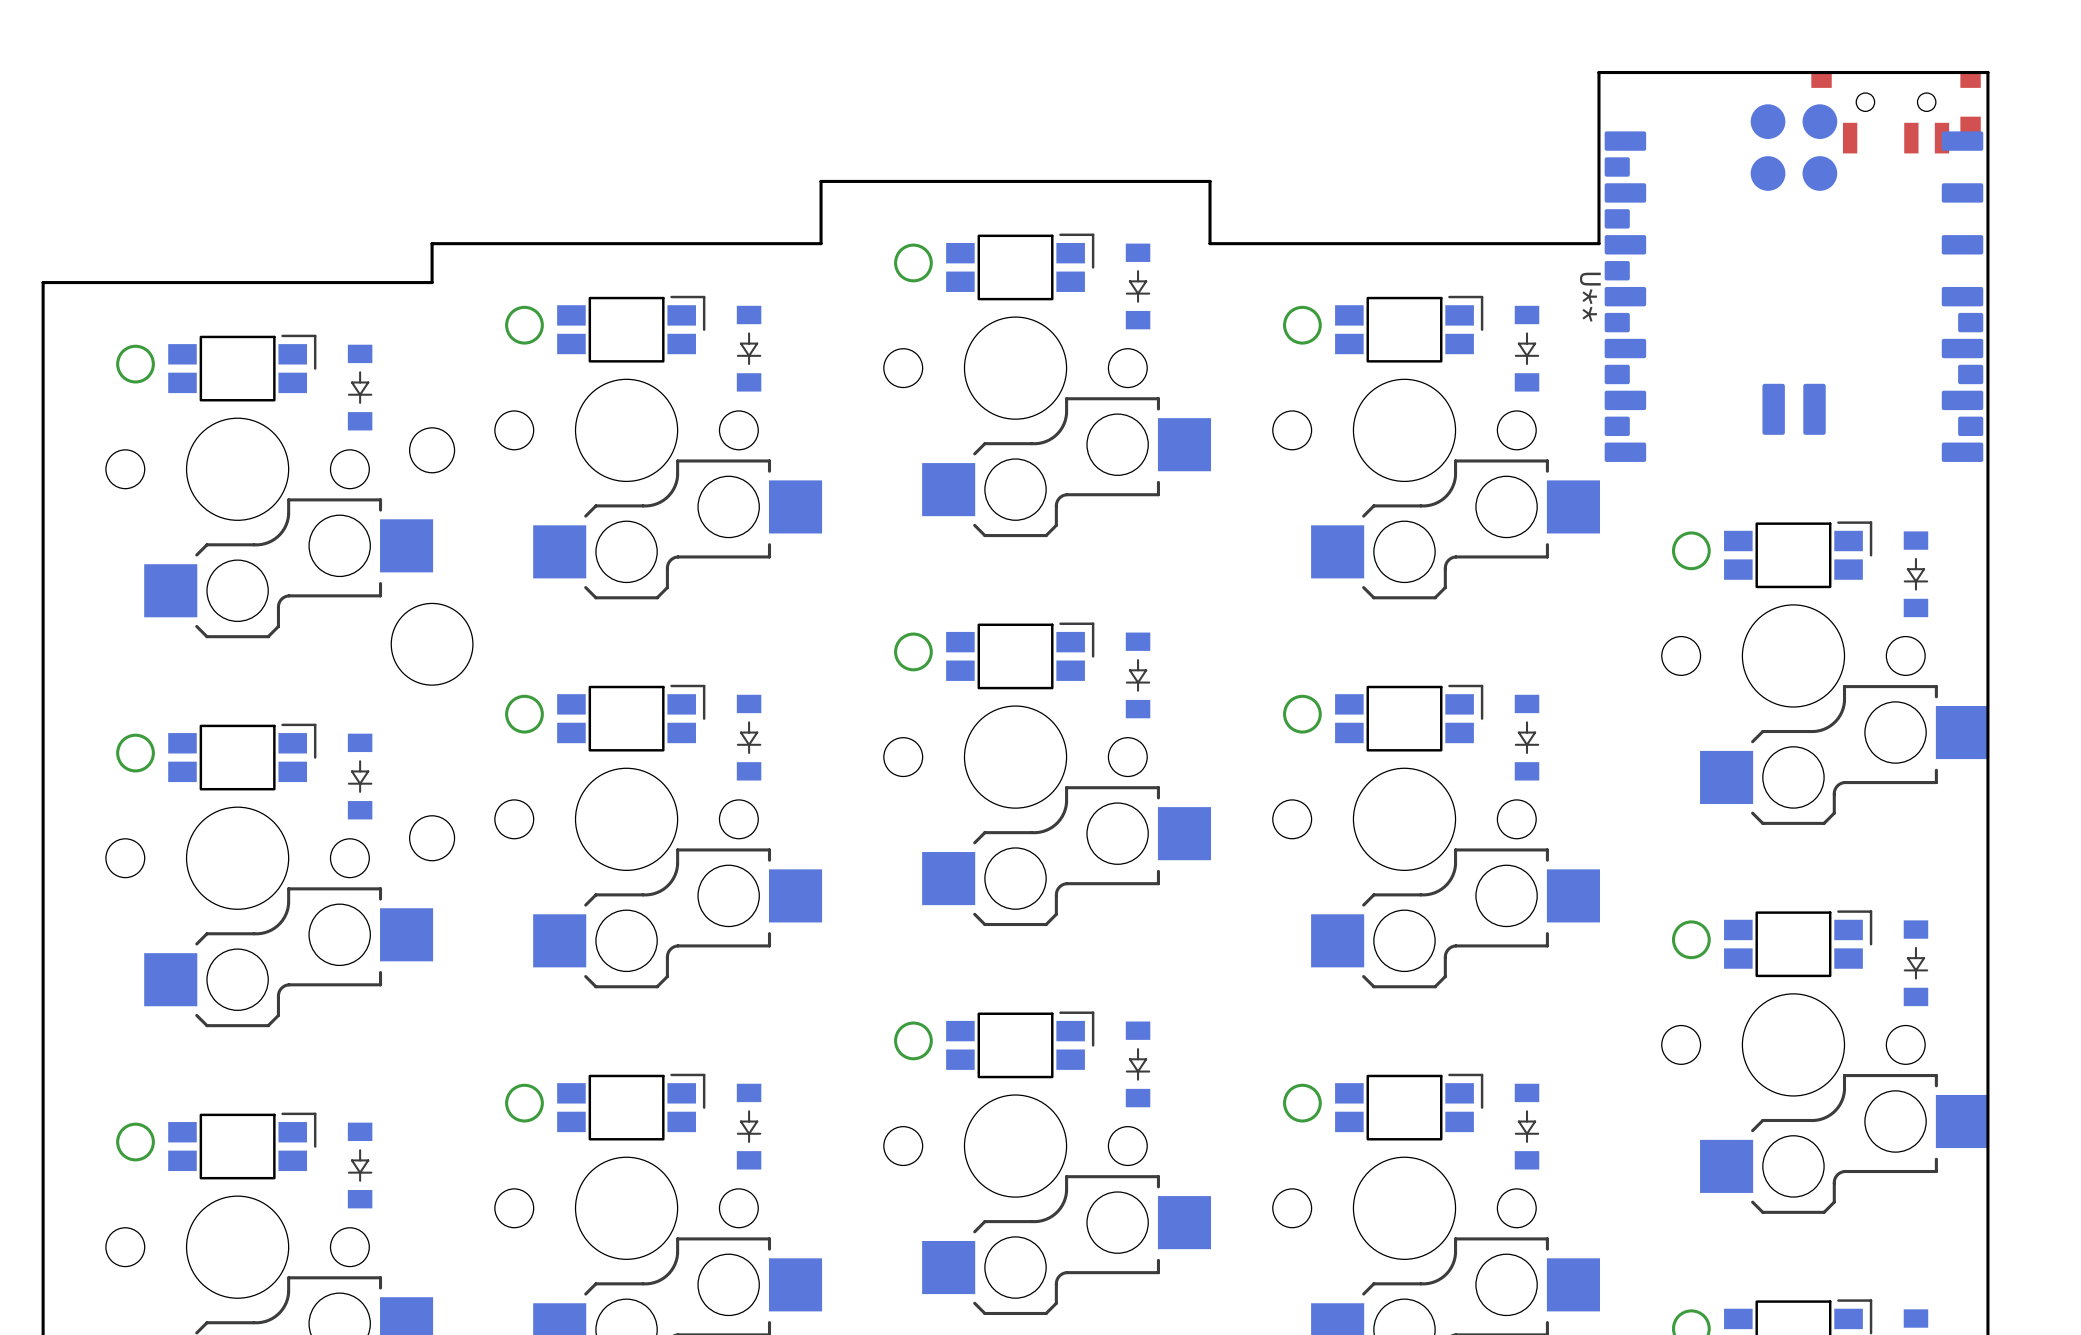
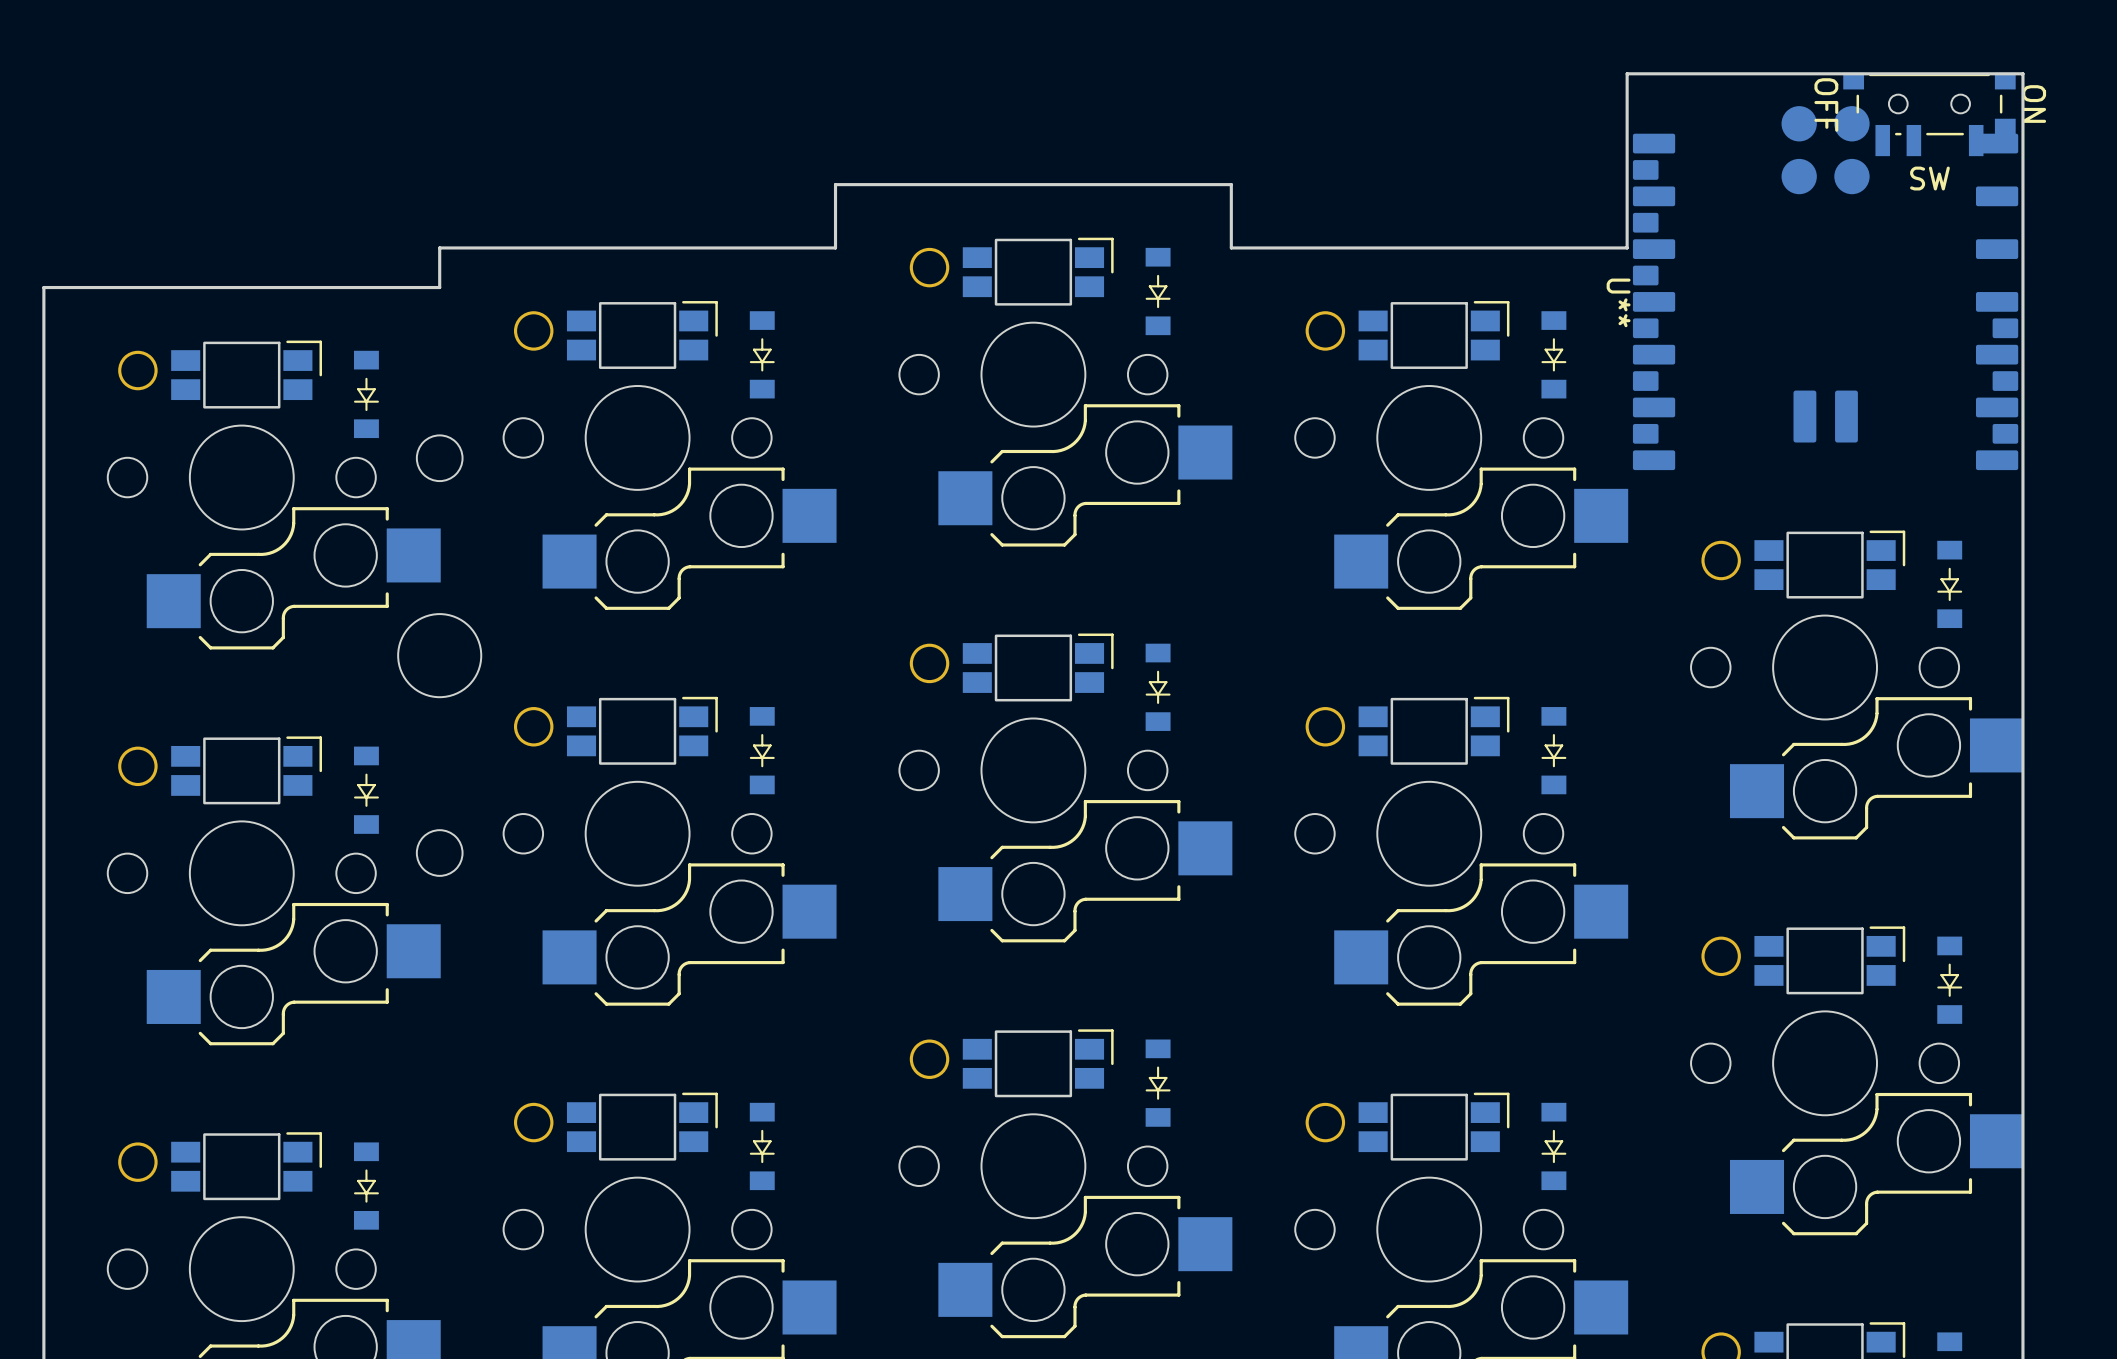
SW side: top (1896, 112) -> bottom (1929, 114)

